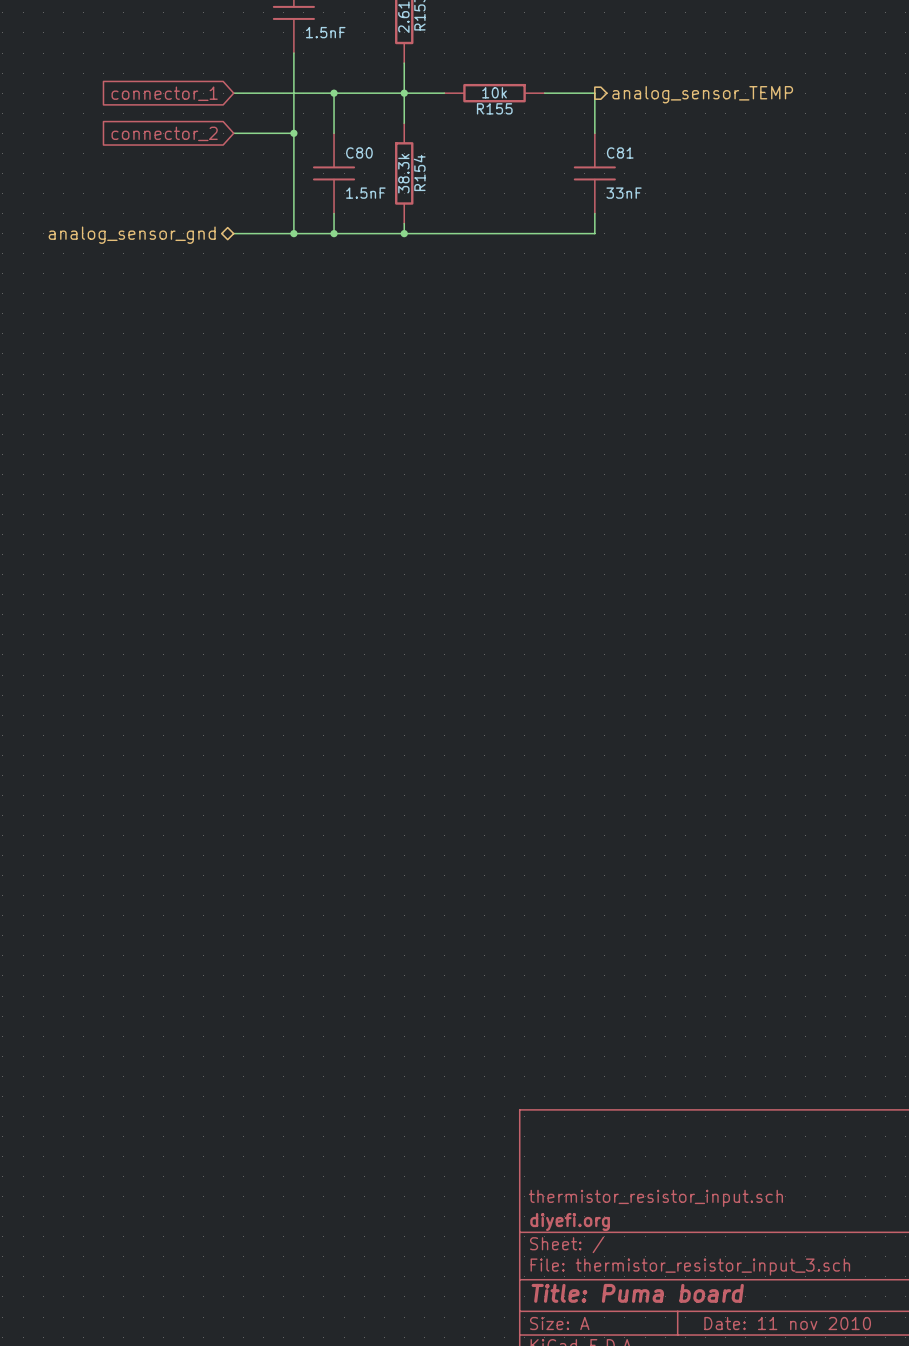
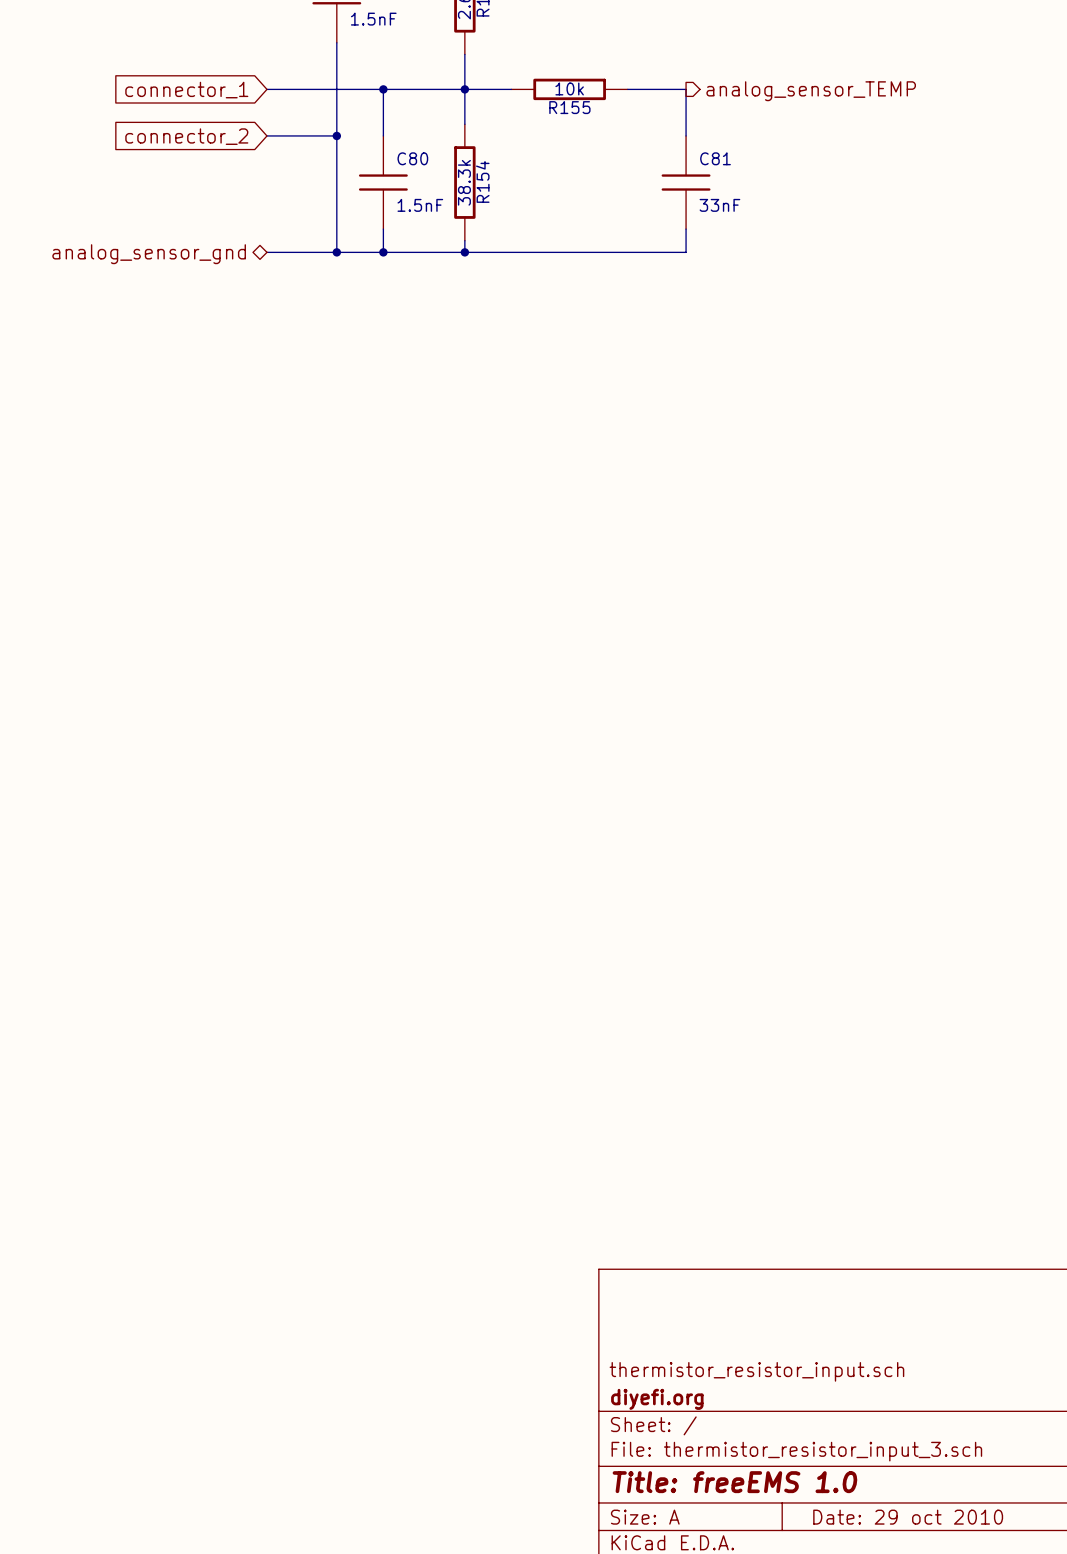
title block: Title: Puma board (637, 1293) -> Title: freeEMS 1.0 (734, 1482)
title block: Date: 11 nov 2010 (787, 1323) -> Date: 29 oct 2010 (908, 1517)

